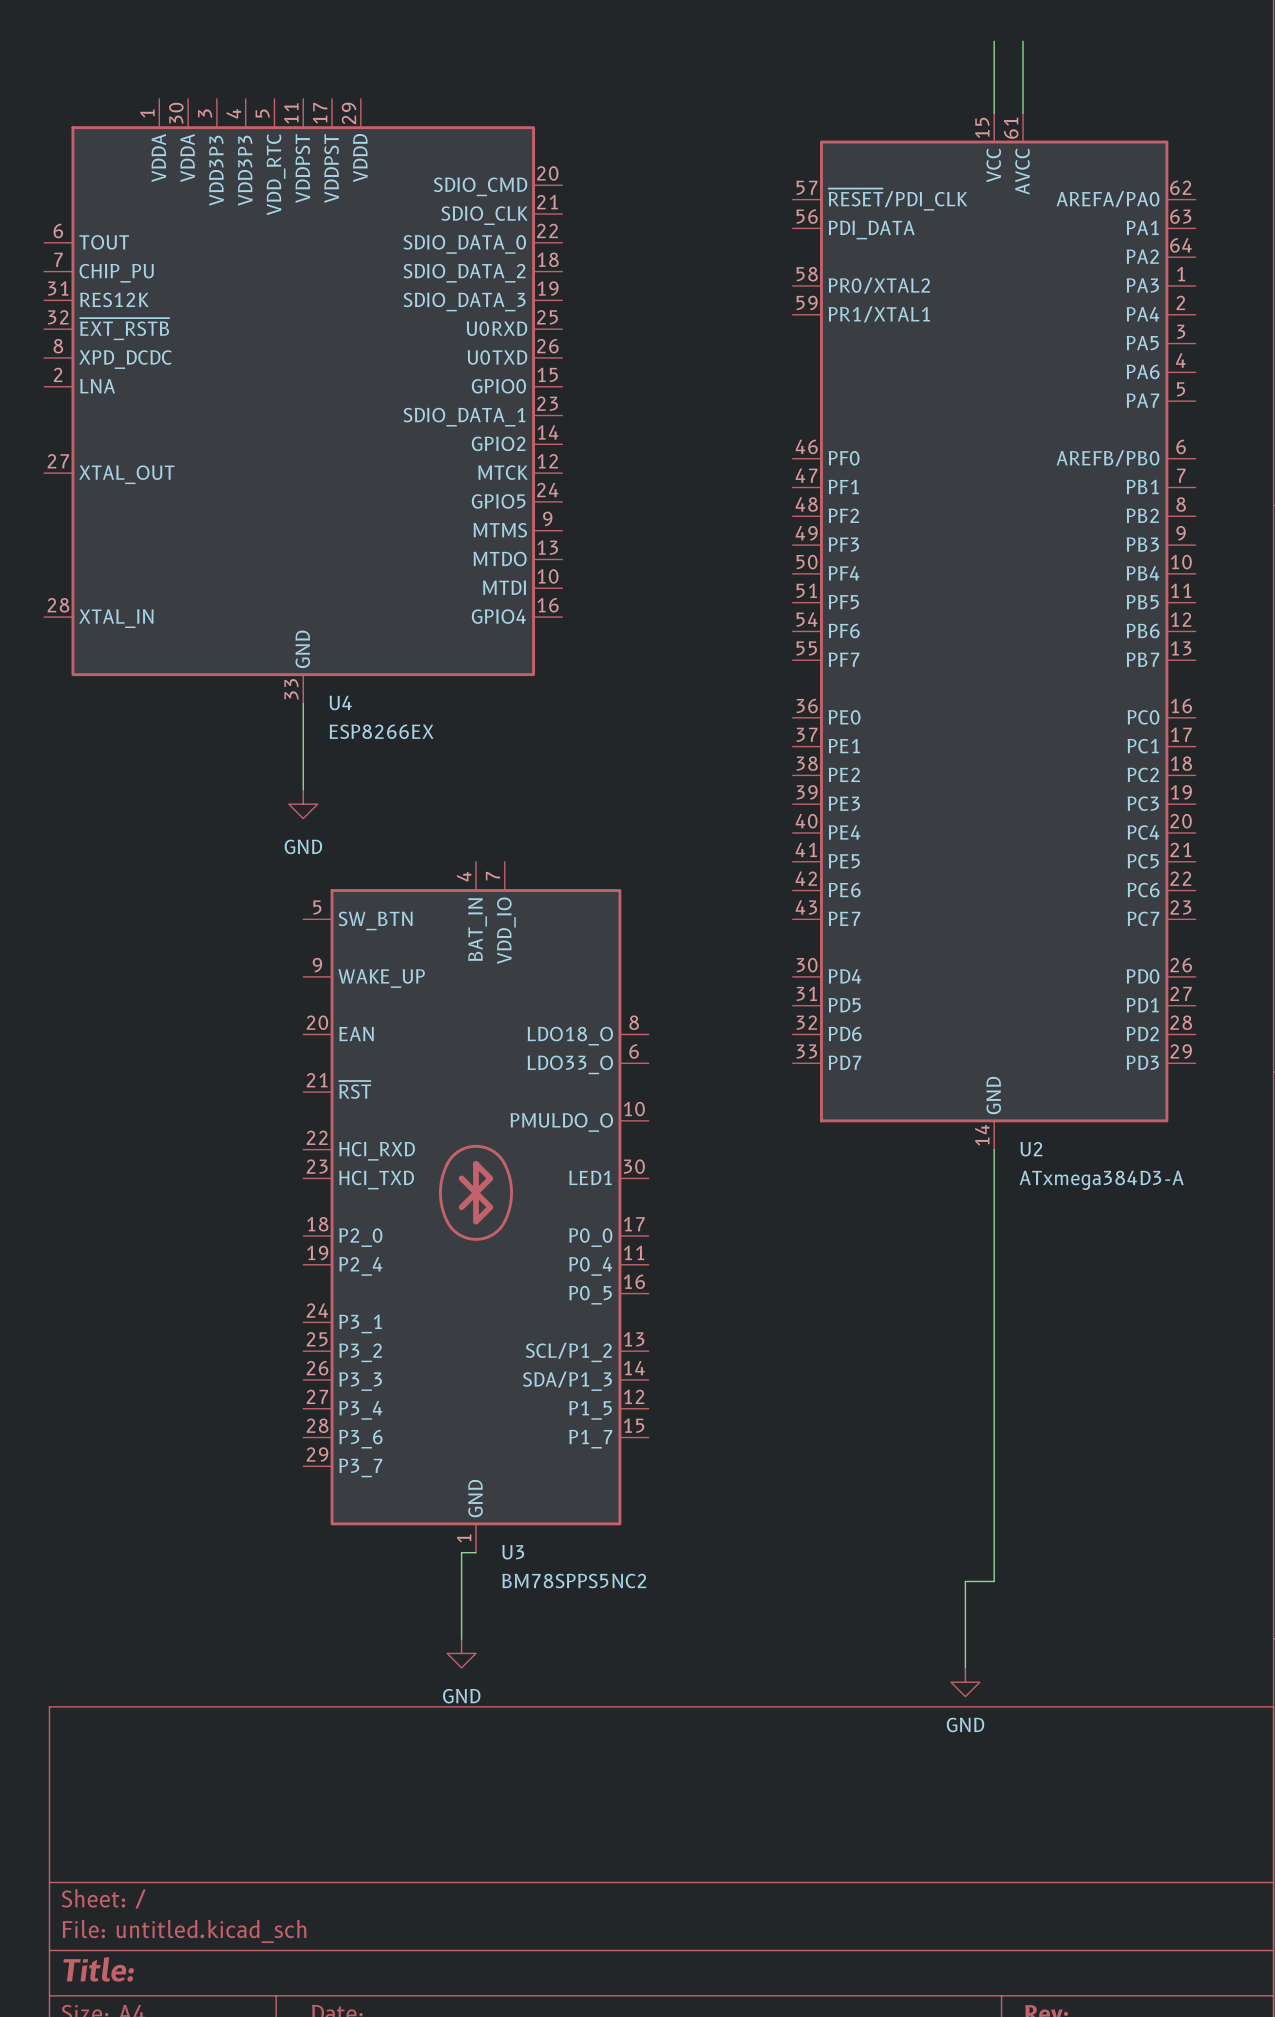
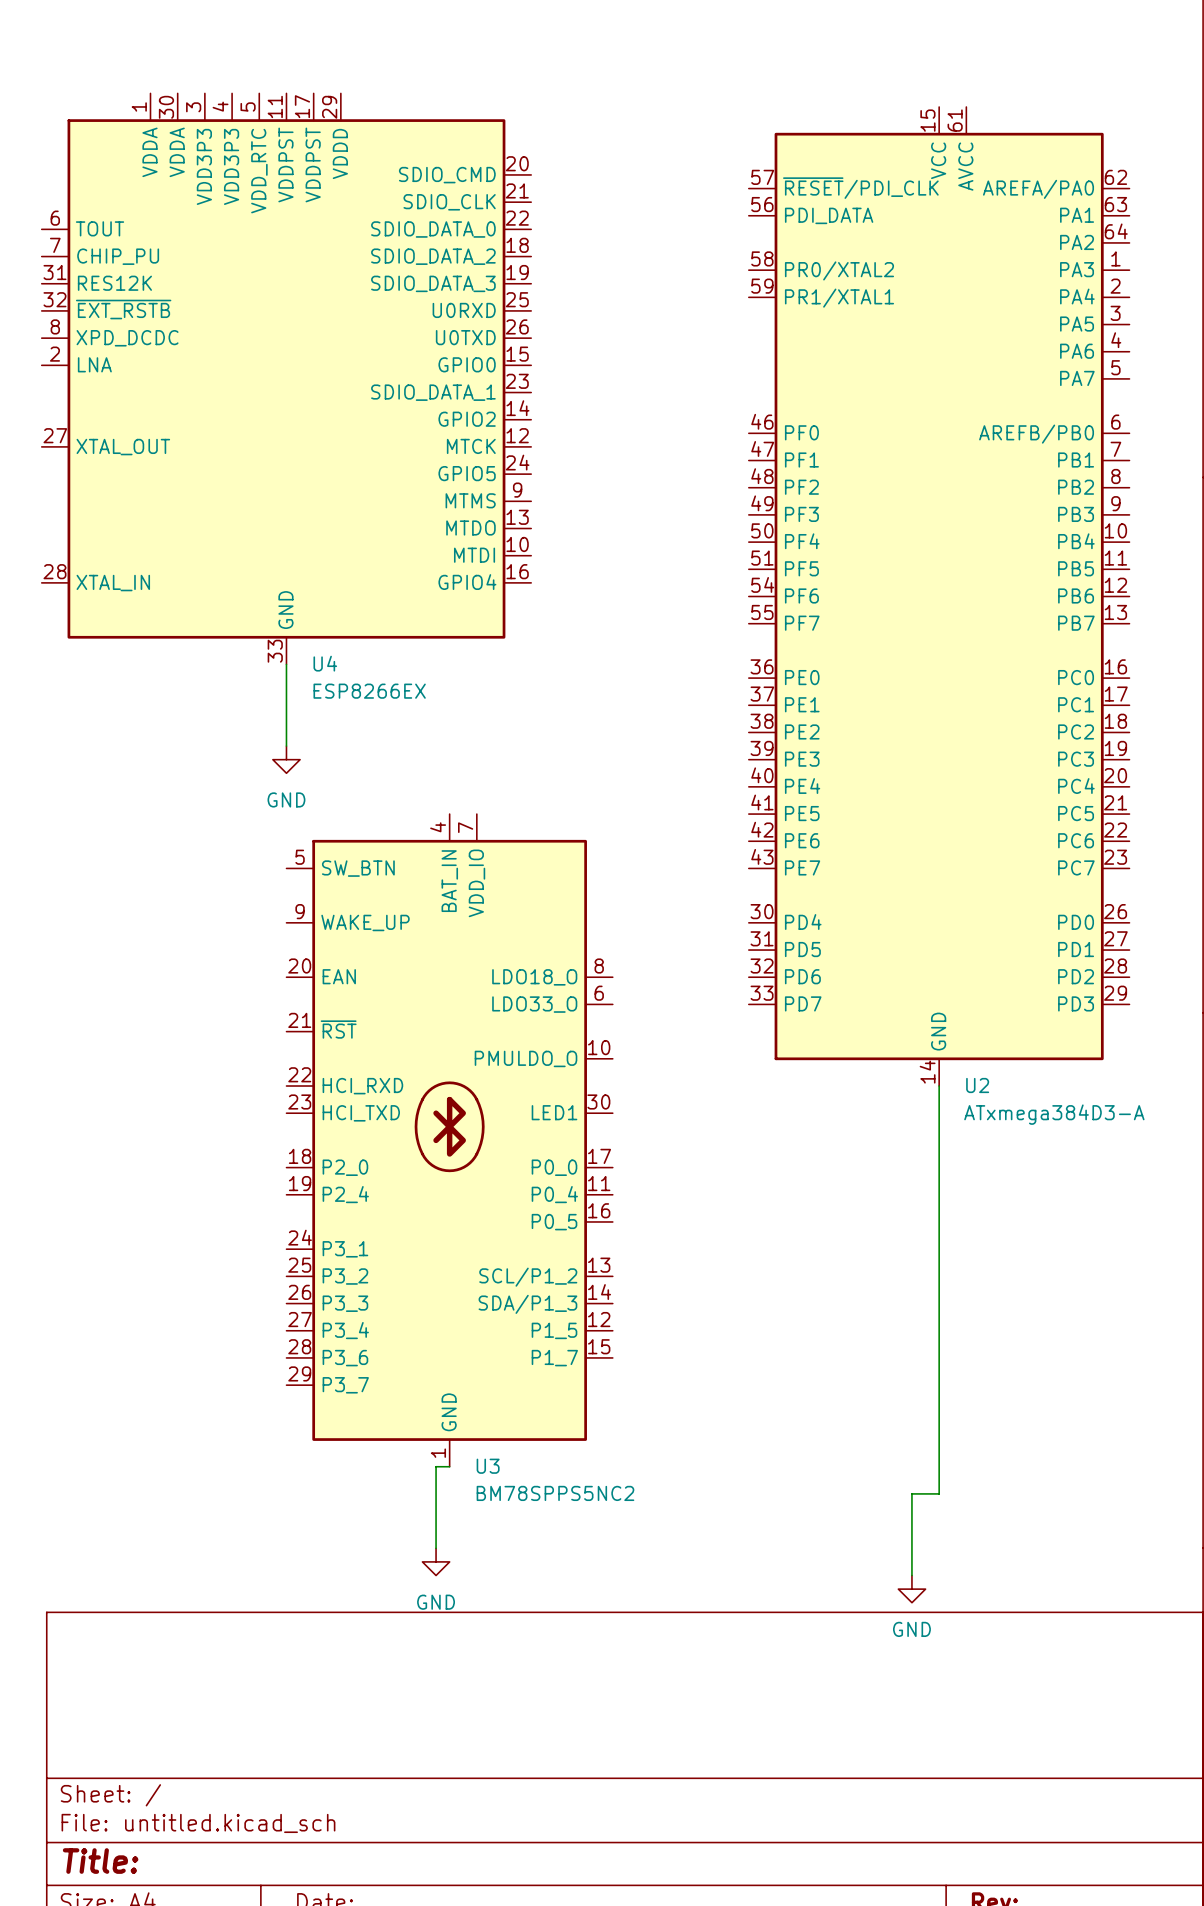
wire: (994, 41) (994, 113) -> none
wire: (1022, 41) (1022, 113) -> none

